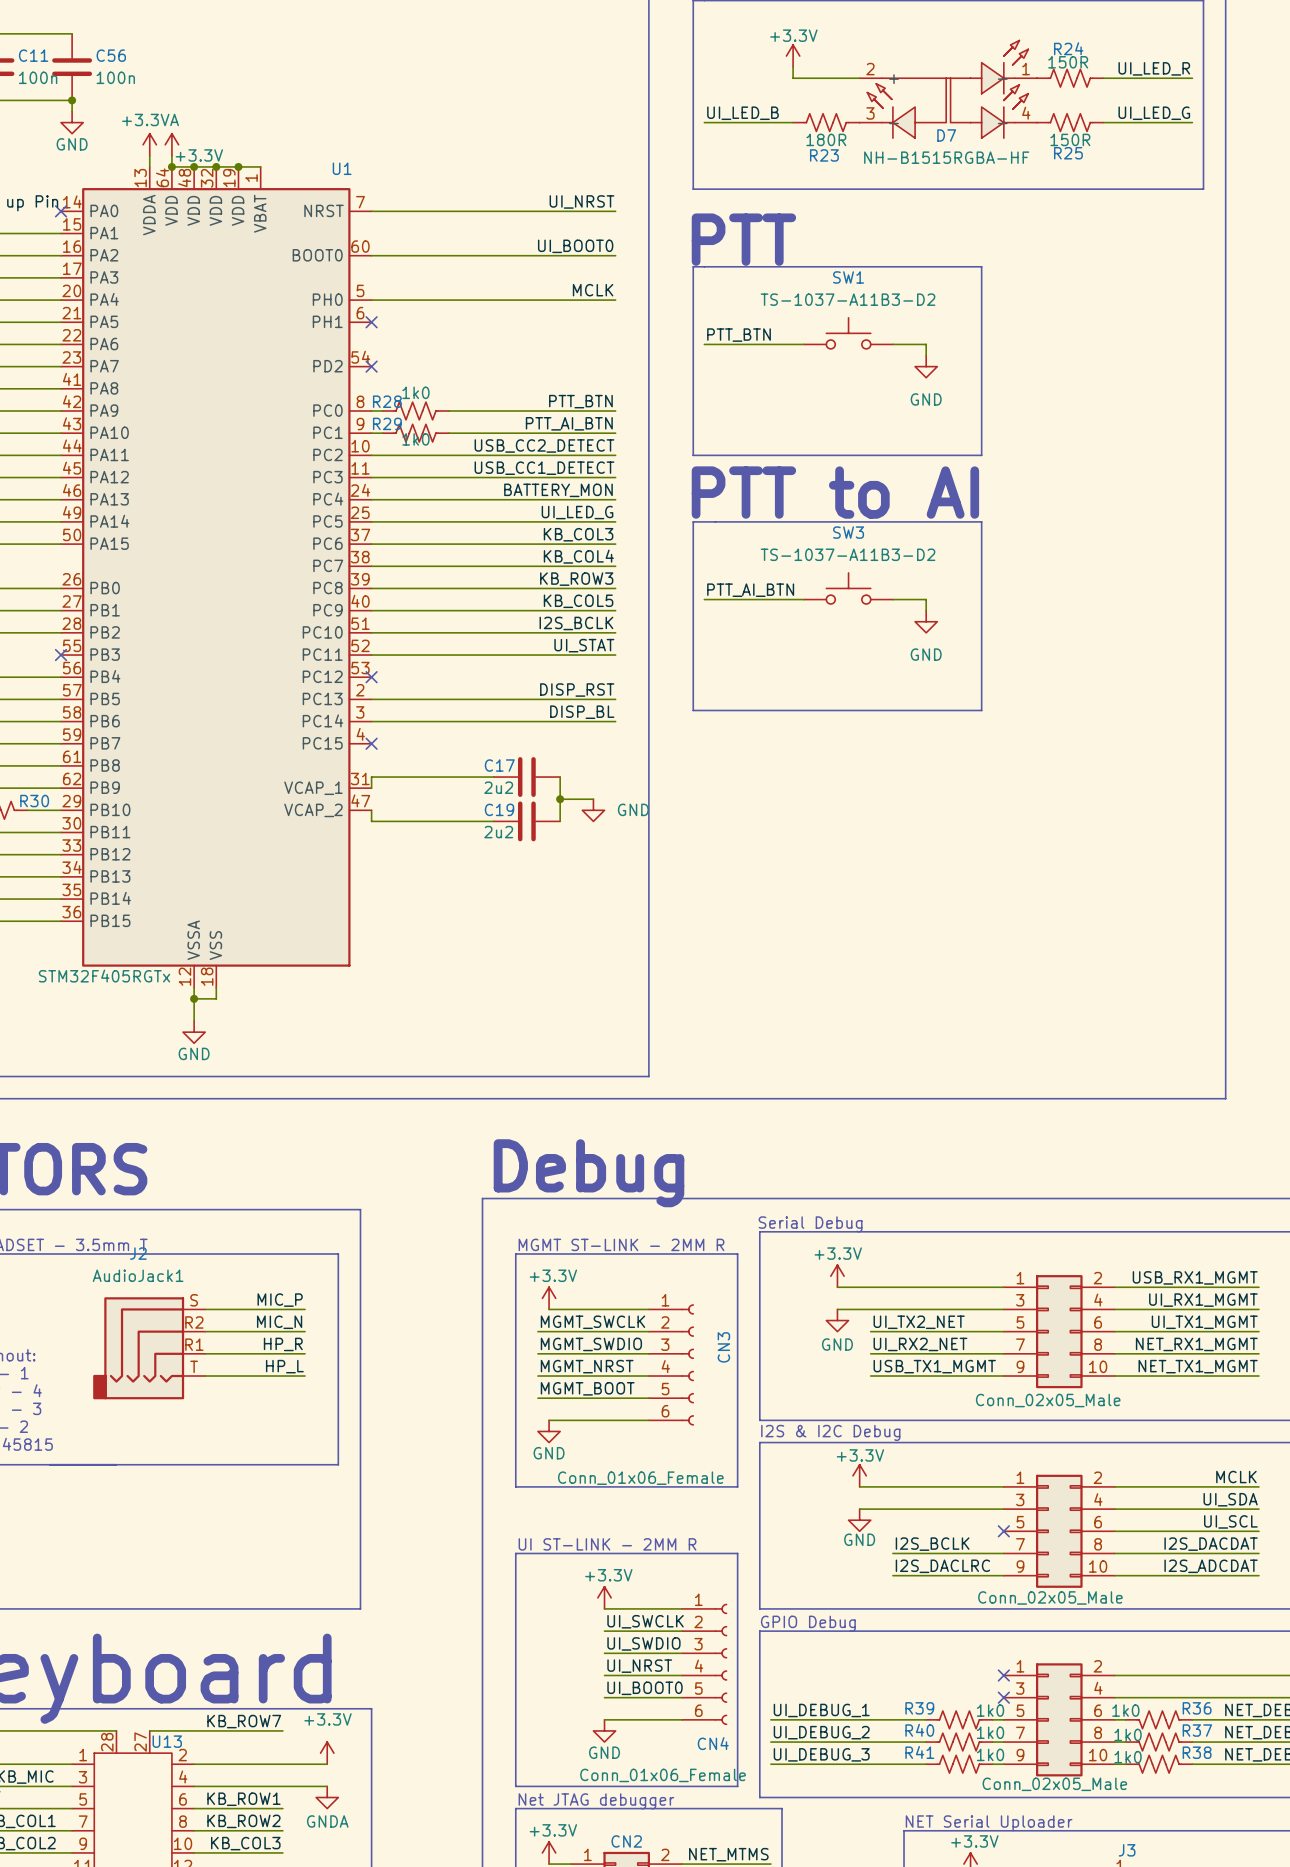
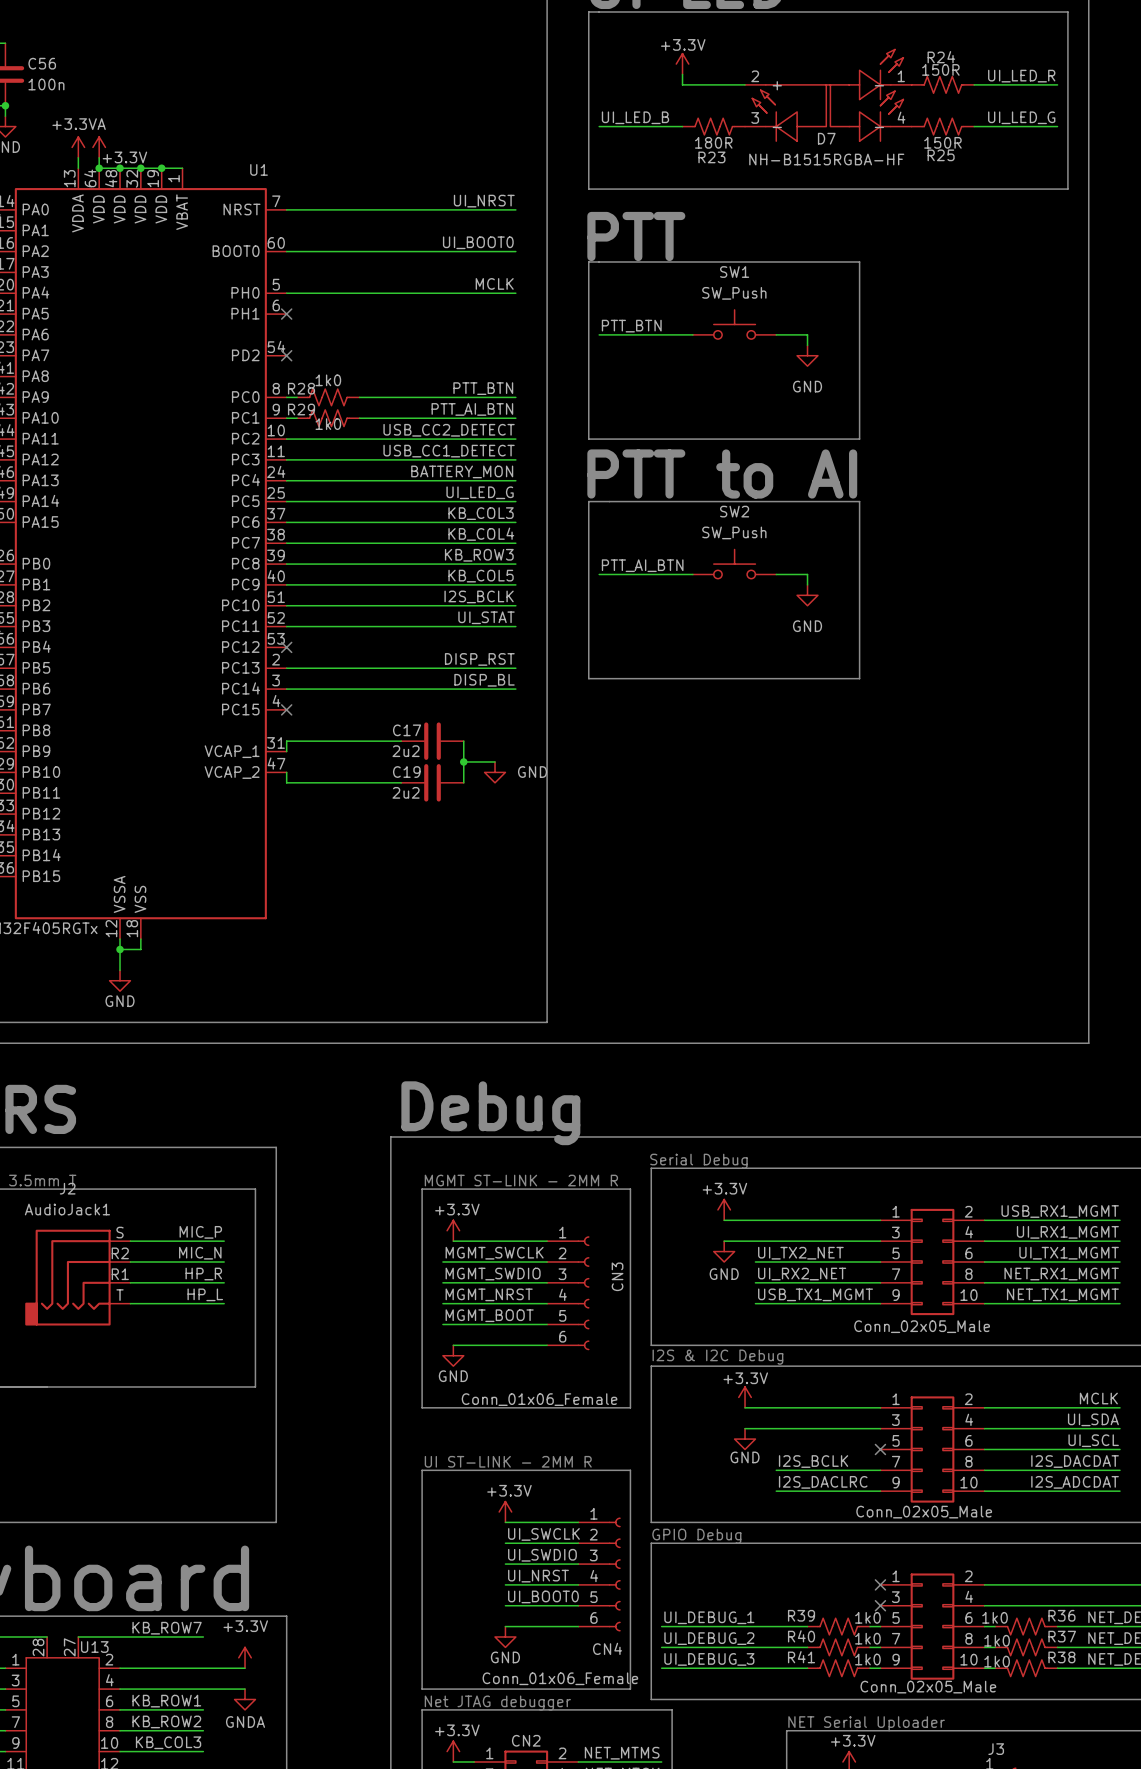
SW1 value: TS-1037-A11B3-D2 (848, 299) -> SW_Push (734, 293)
SW3 name: SW3 (848, 532) -> SW2 (734, 511)
SW3 value: TS-1037-A11B3-D2 (848, 554) -> SW_Push (734, 532)

